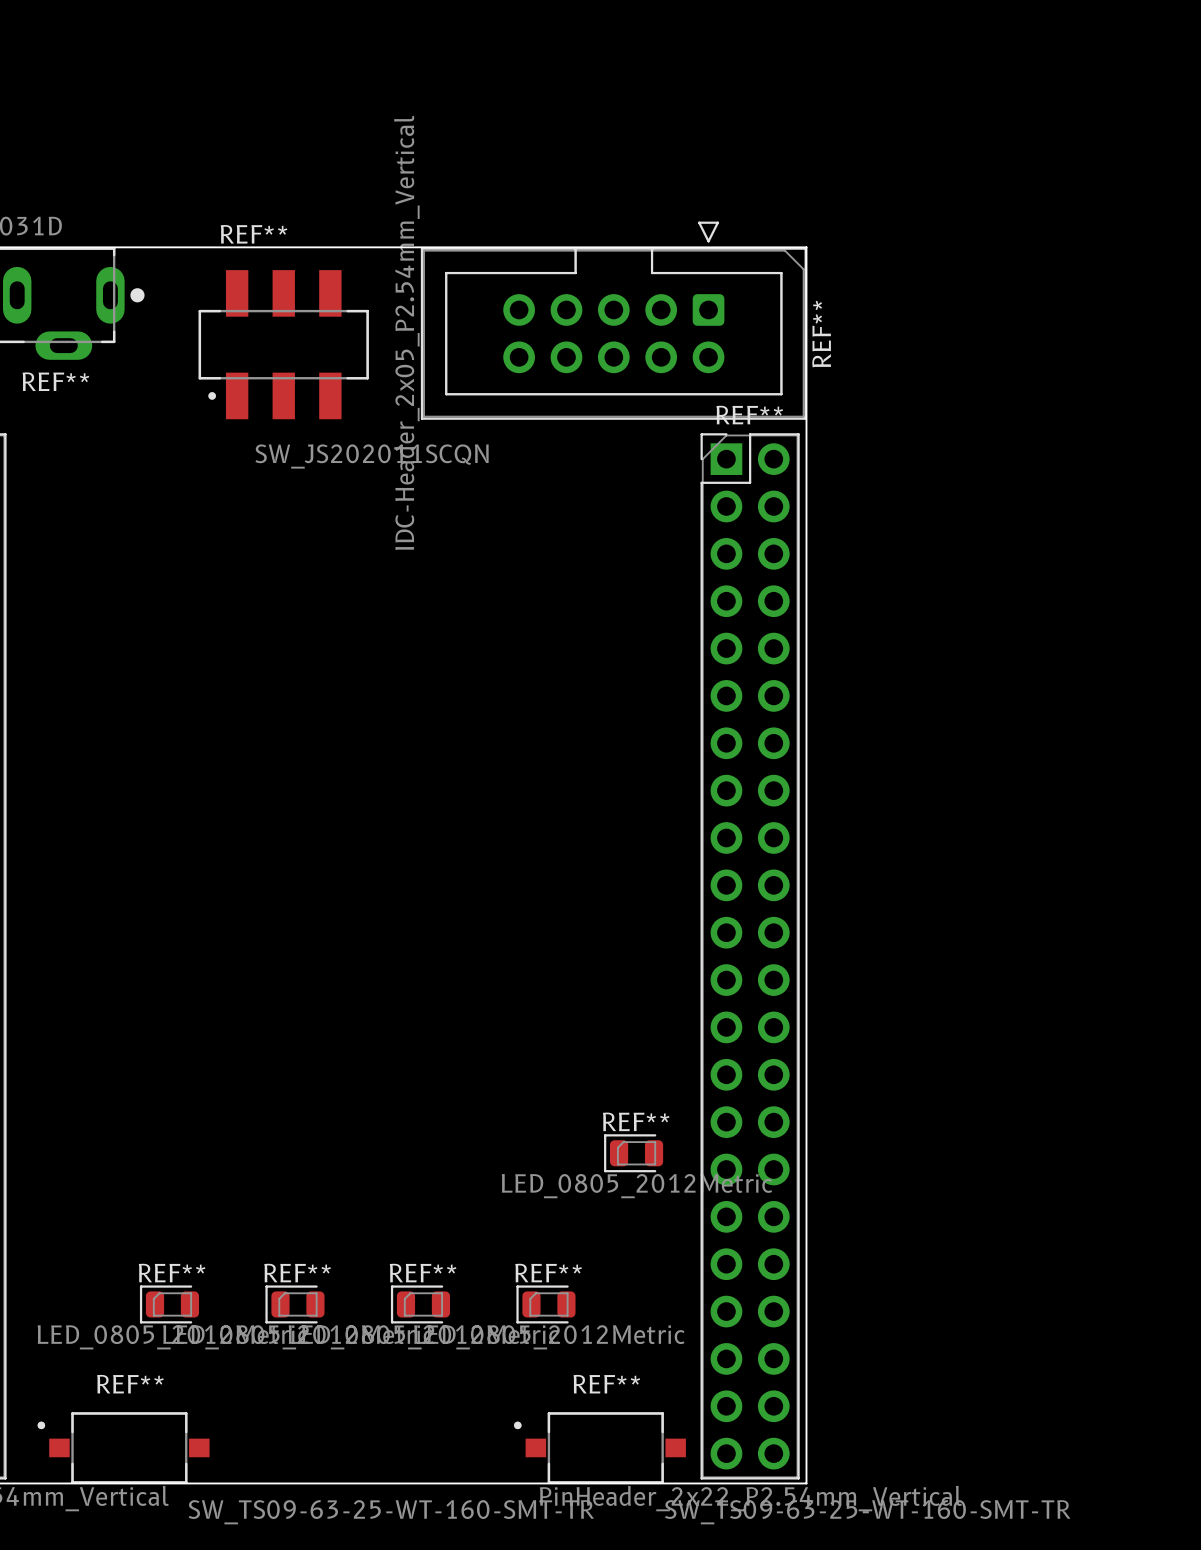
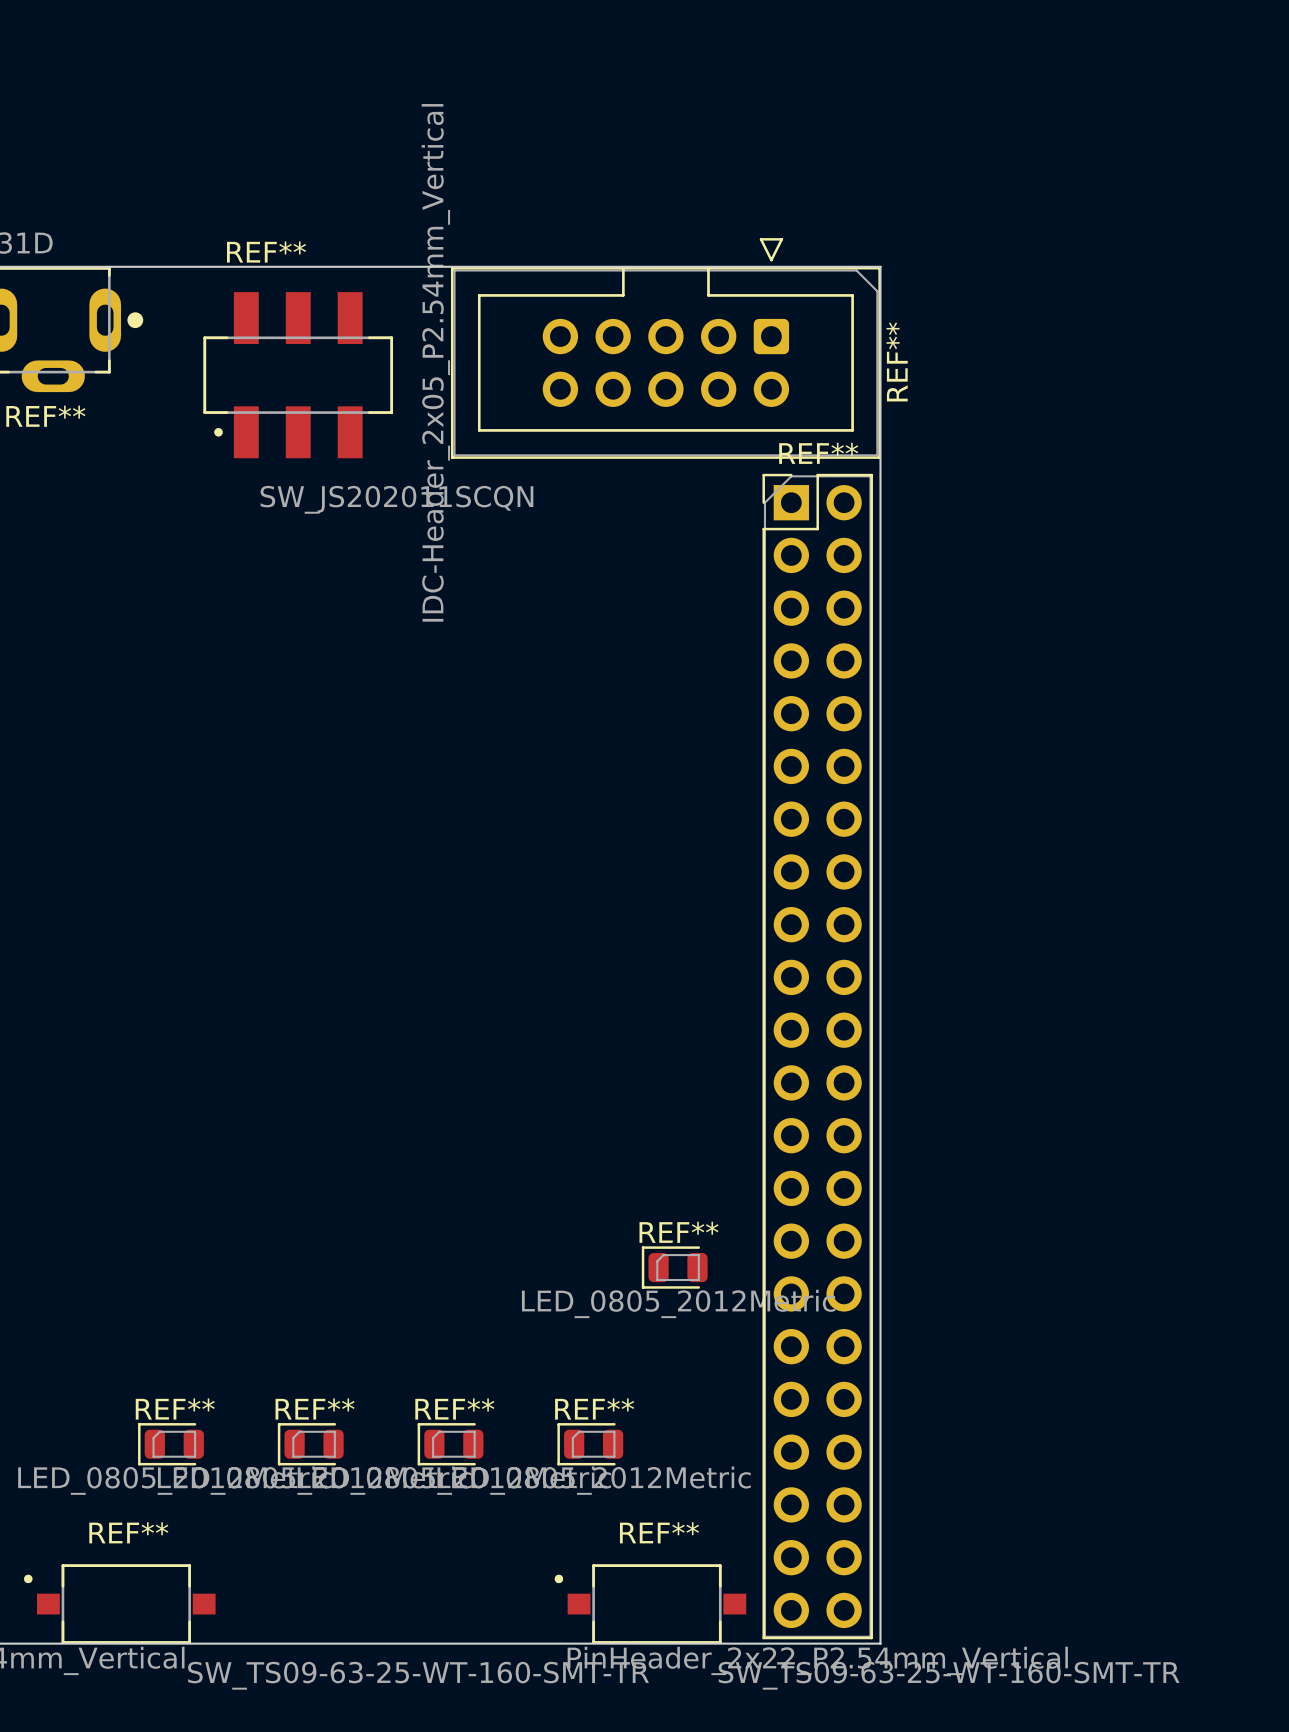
REF** position: (633, 1153) -> (674, 1267)

